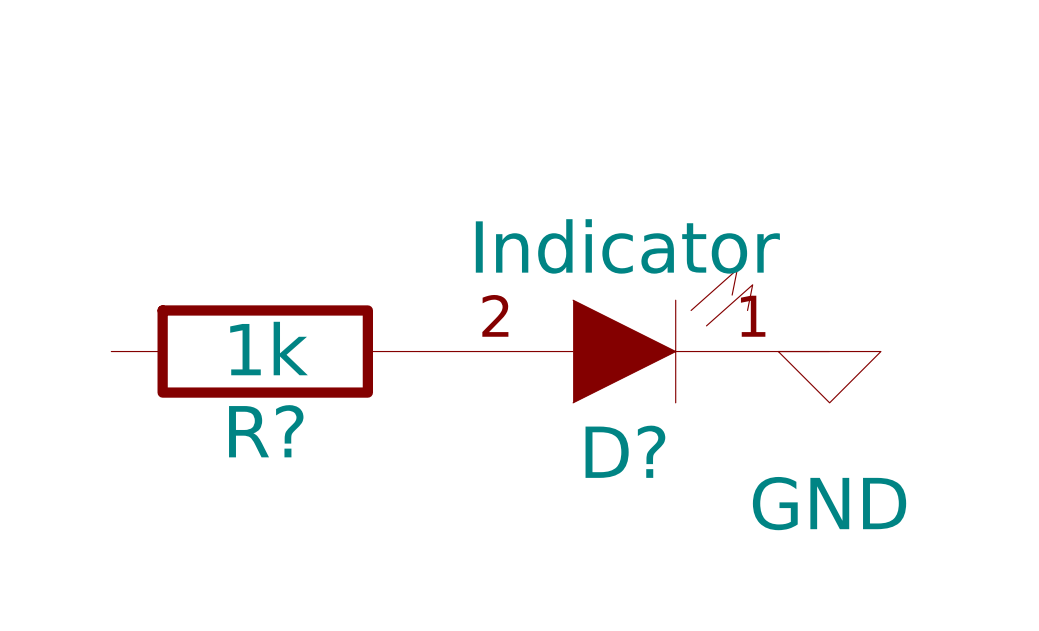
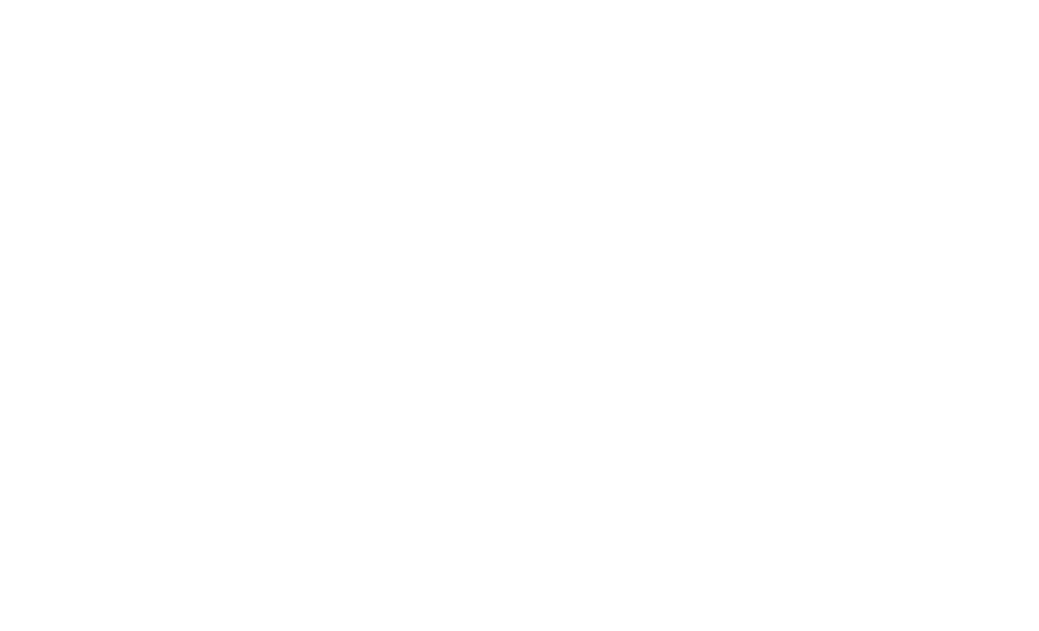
D?: Indicator (624, 336) -> none
R?: 1k (265, 351) -> none
power symbol: GND (829, 377) -> none

